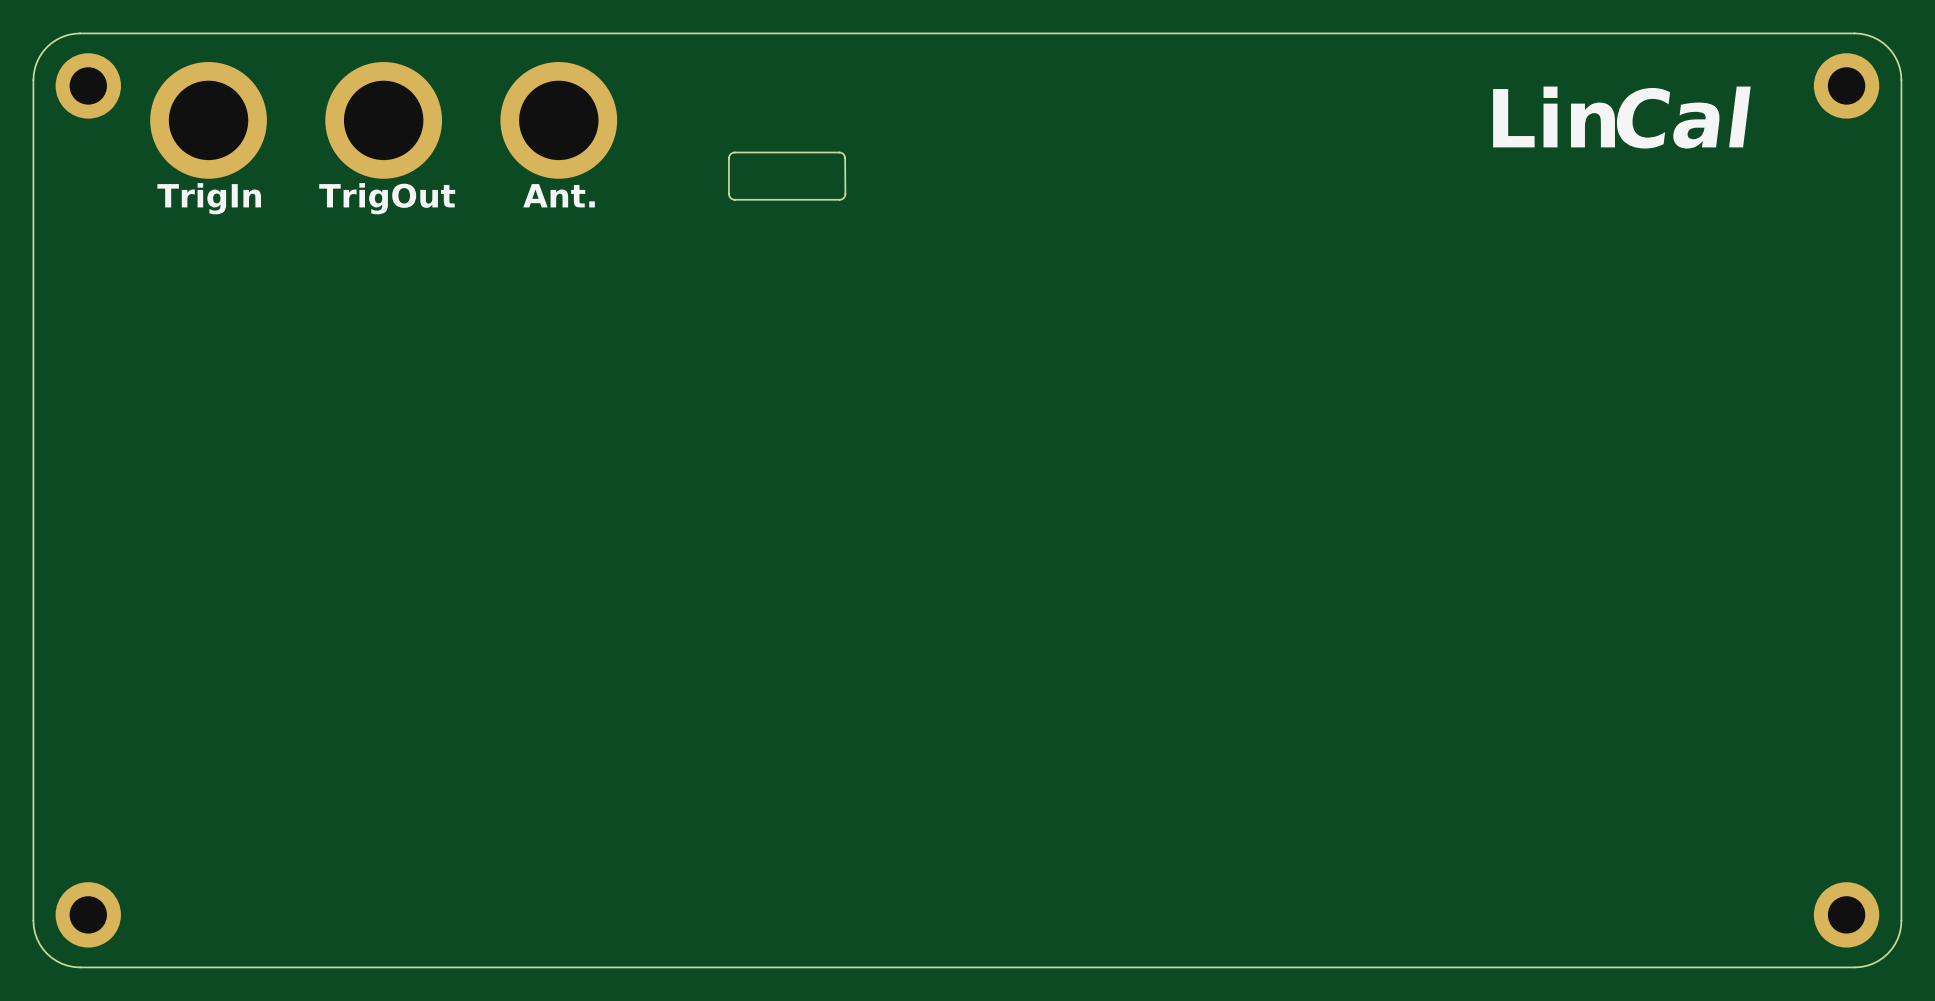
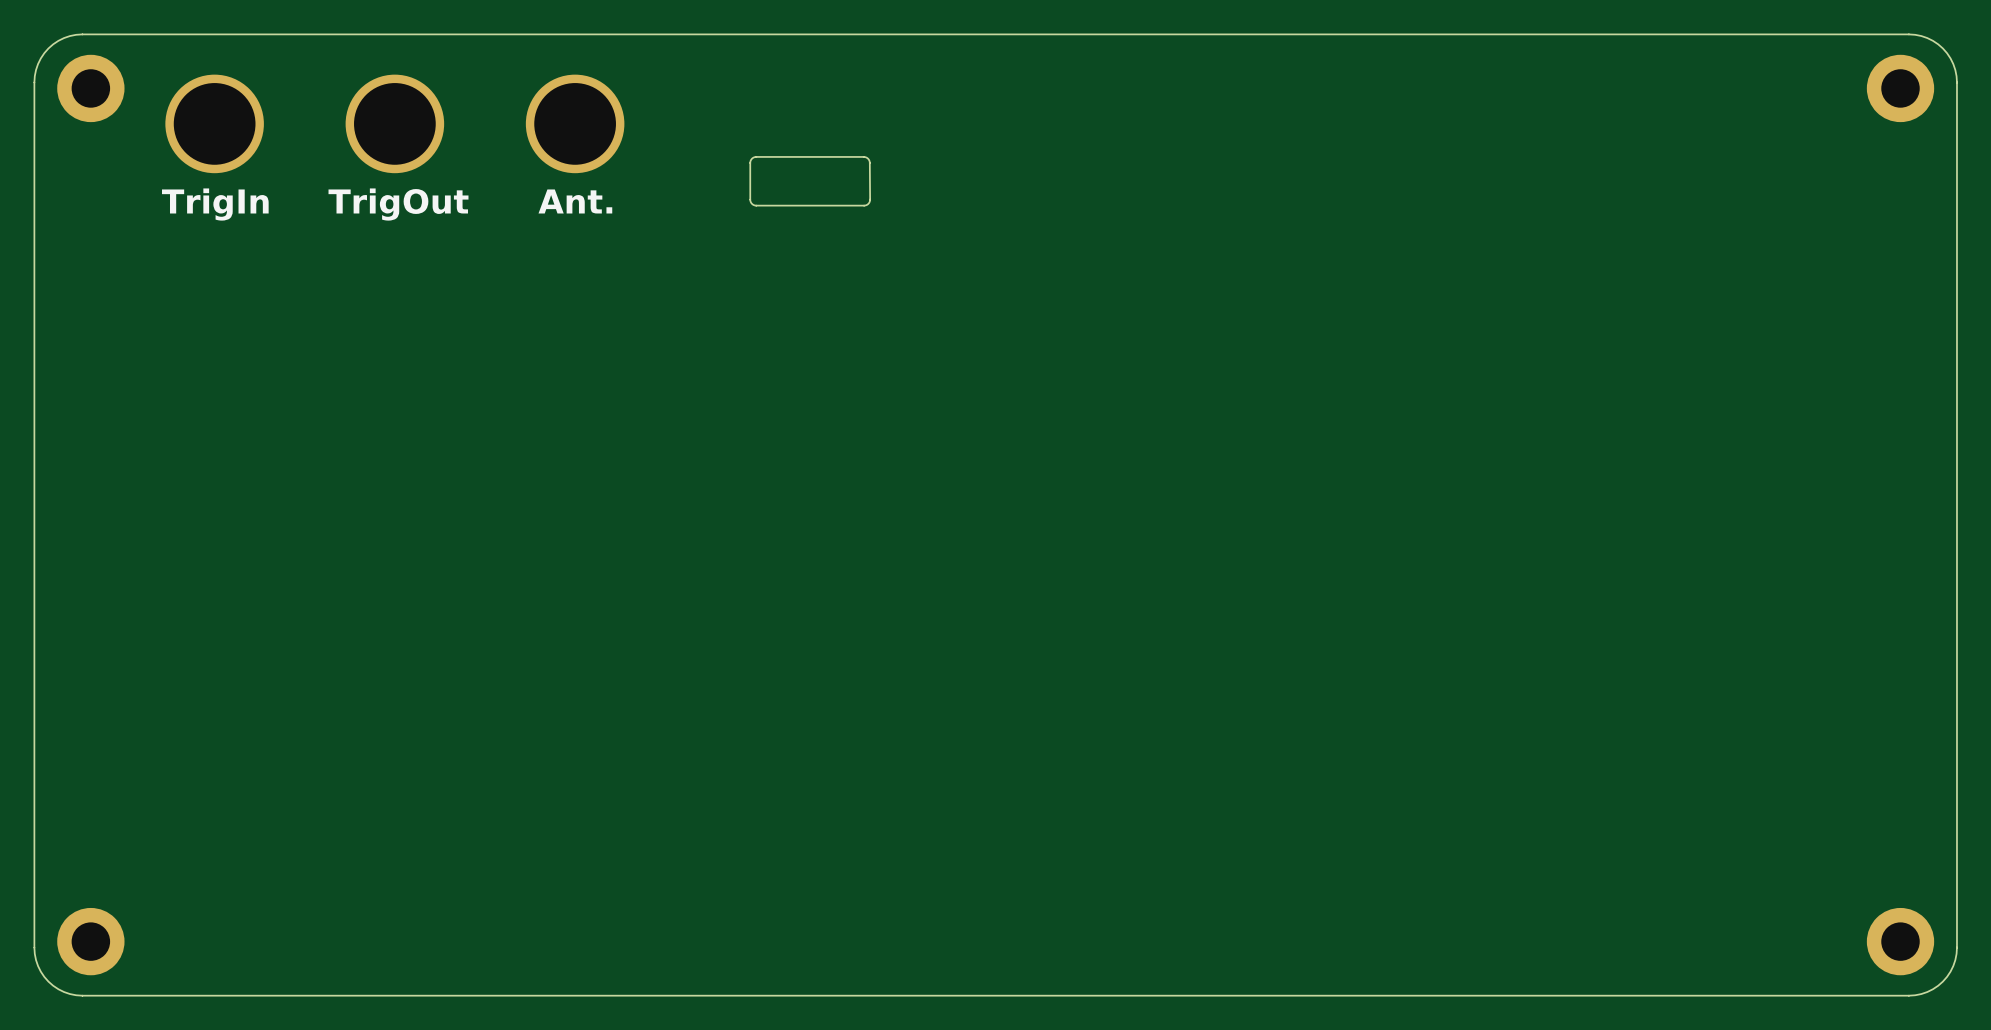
part footprint: [150, 62, 267, 179] -> [165, 74, 264, 174]
part footprint: [325, 62, 443, 179] -> [345, 74, 445, 174]
part footprint: [500, 62, 618, 179] -> [525, 74, 625, 174]
text: Lin (1554, 116) -> none
text: Cal (1683, 117) -> none

